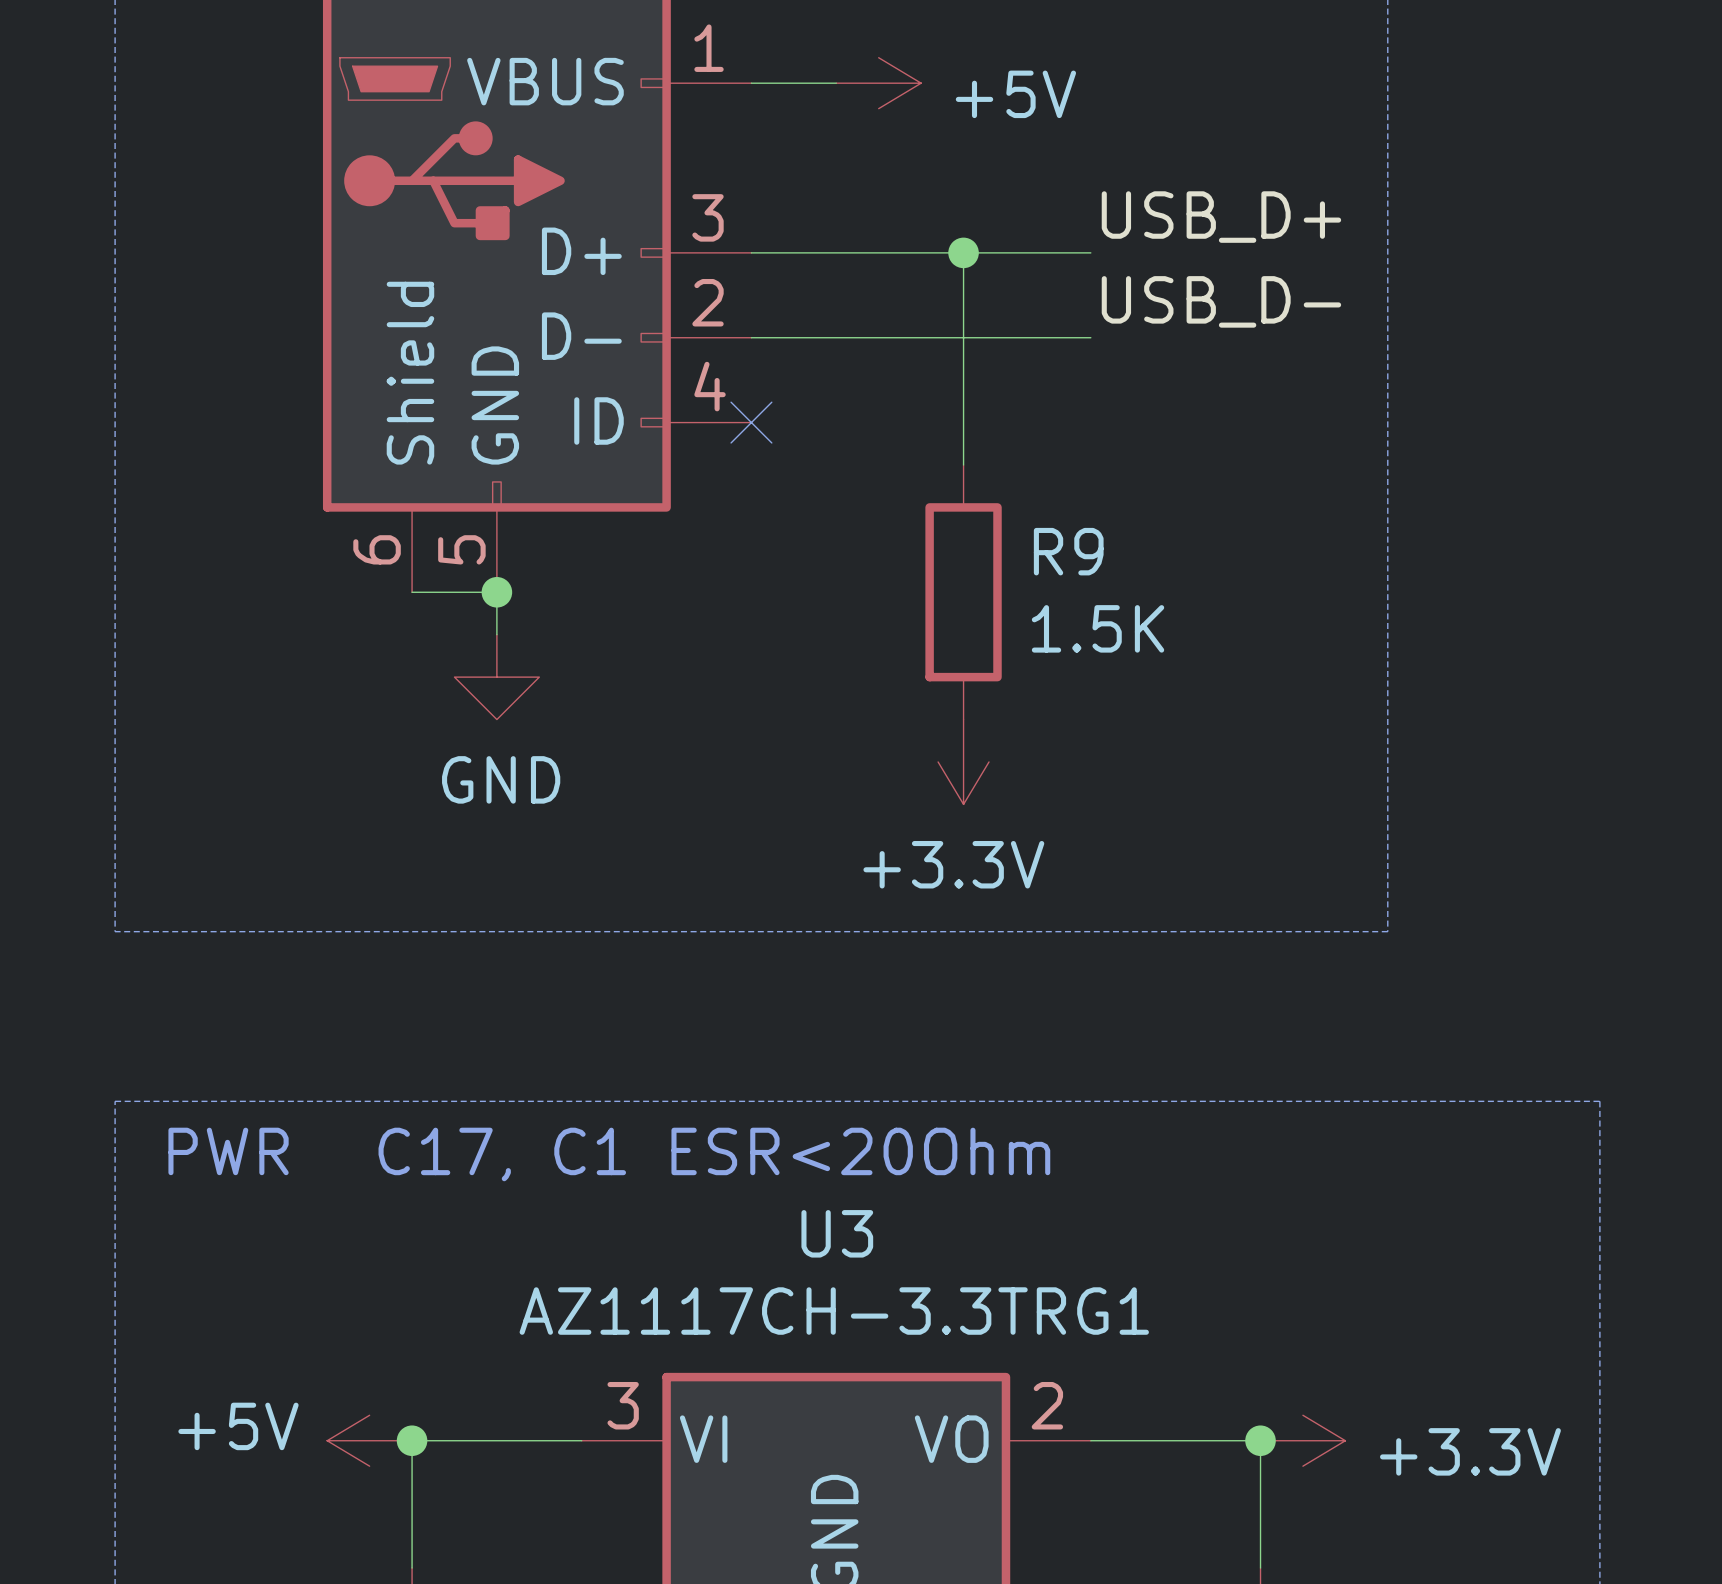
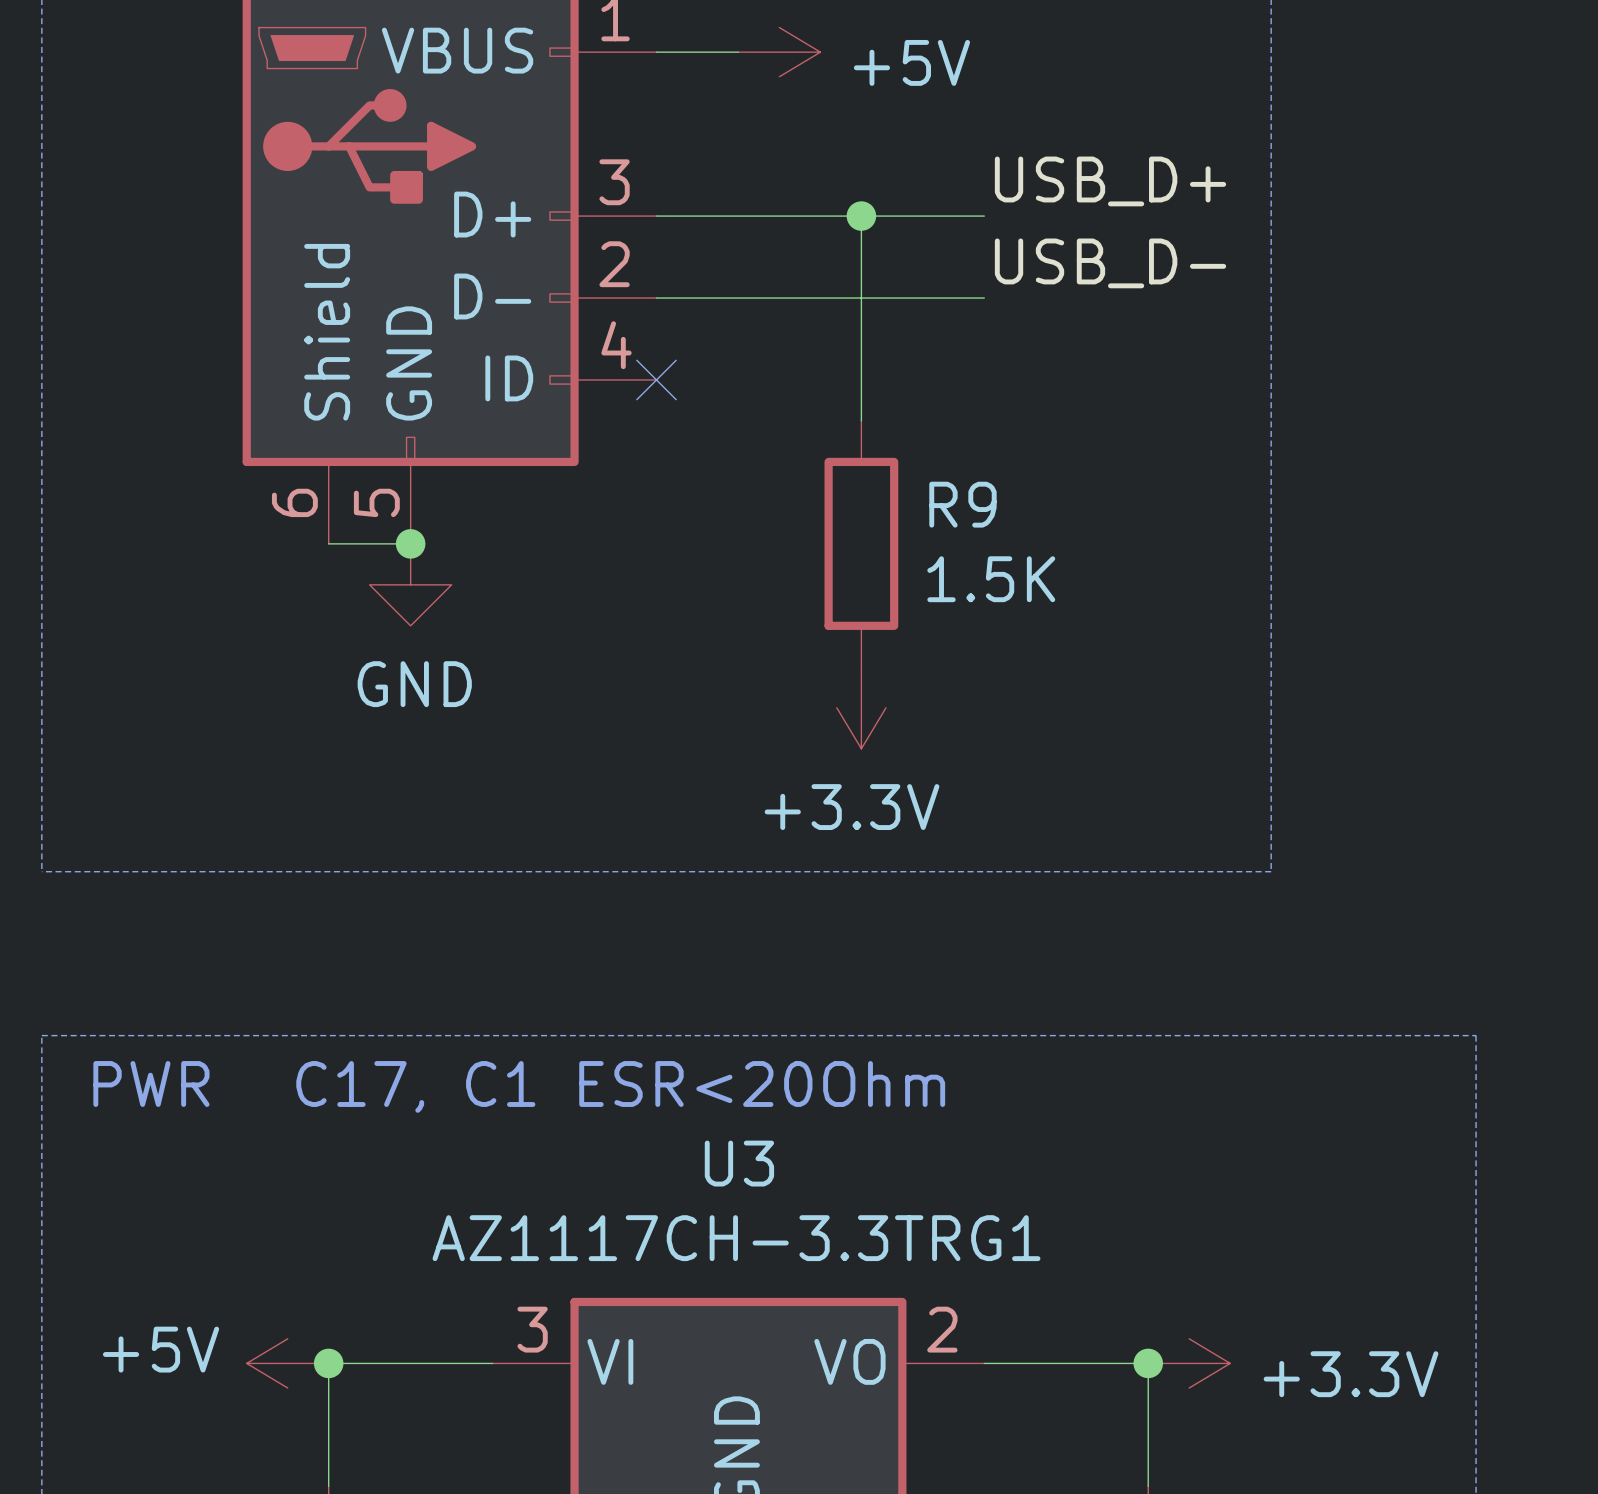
power symbol position: GND (496, 677) -> GND (410, 584)

